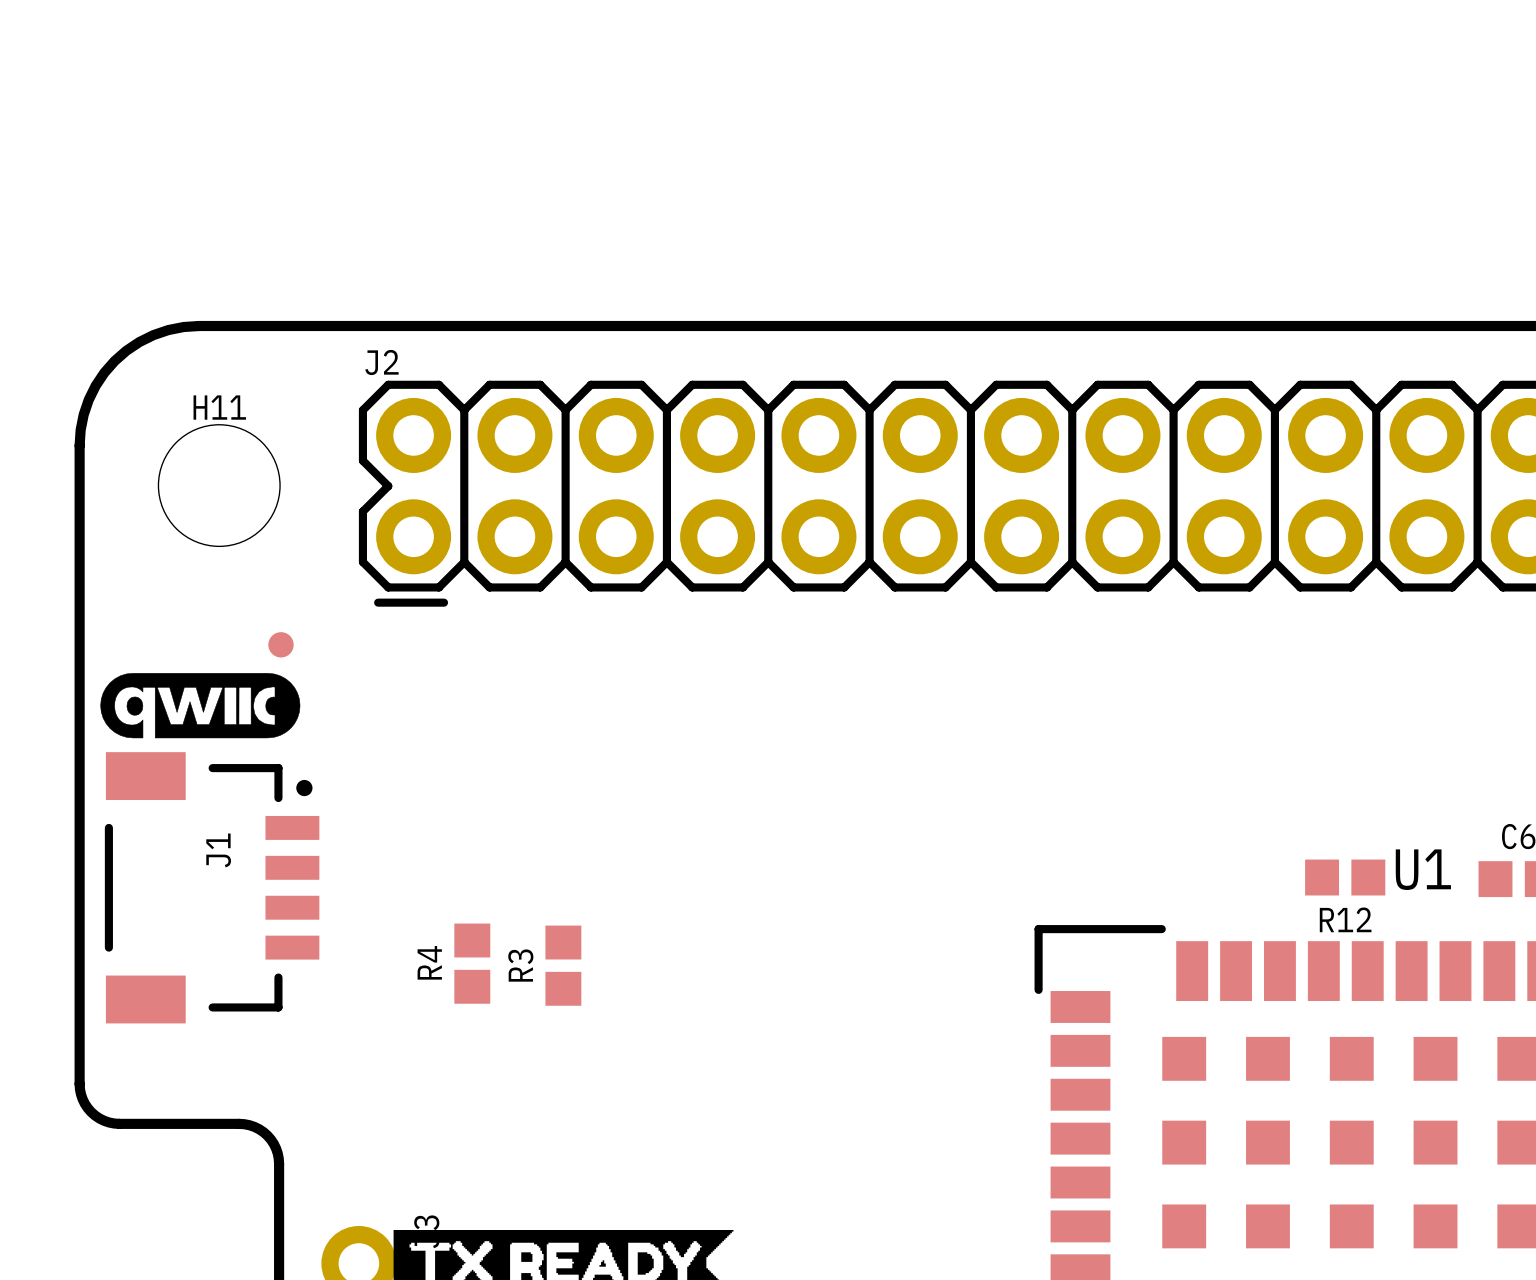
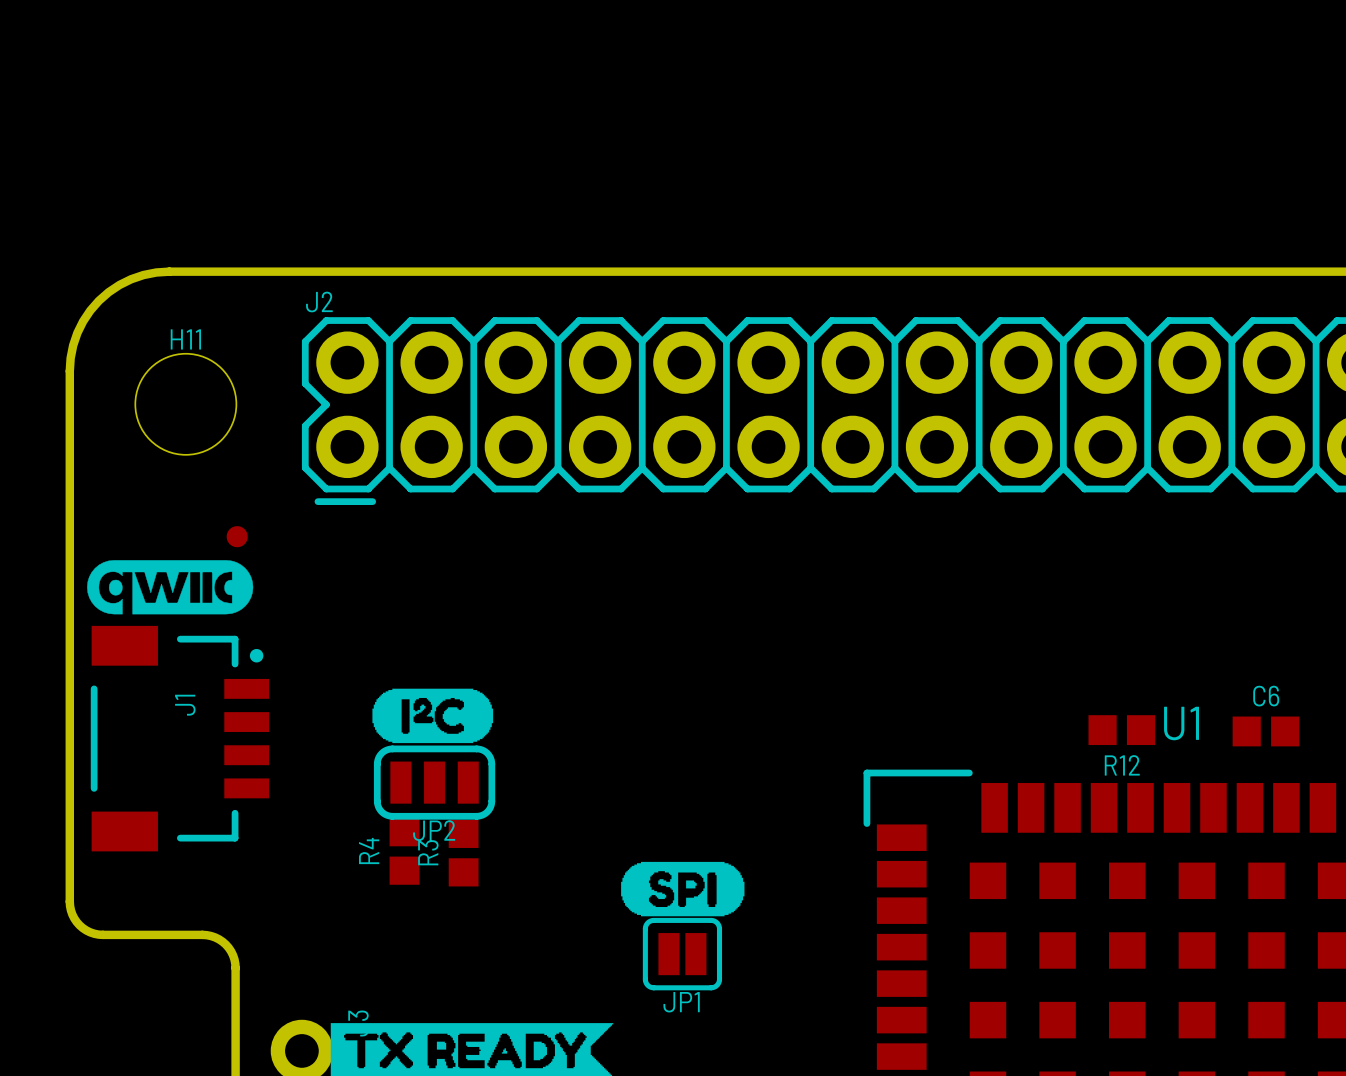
drawing: none -> [372, 688, 494, 744]
JP2: none -> (434, 782)
R4 position: (472, 963) -> (404, 851)
R3 position: (563, 965) -> (463, 853)
drawing: none -> [621, 861, 745, 917]
JP1: none -> (682, 954)

